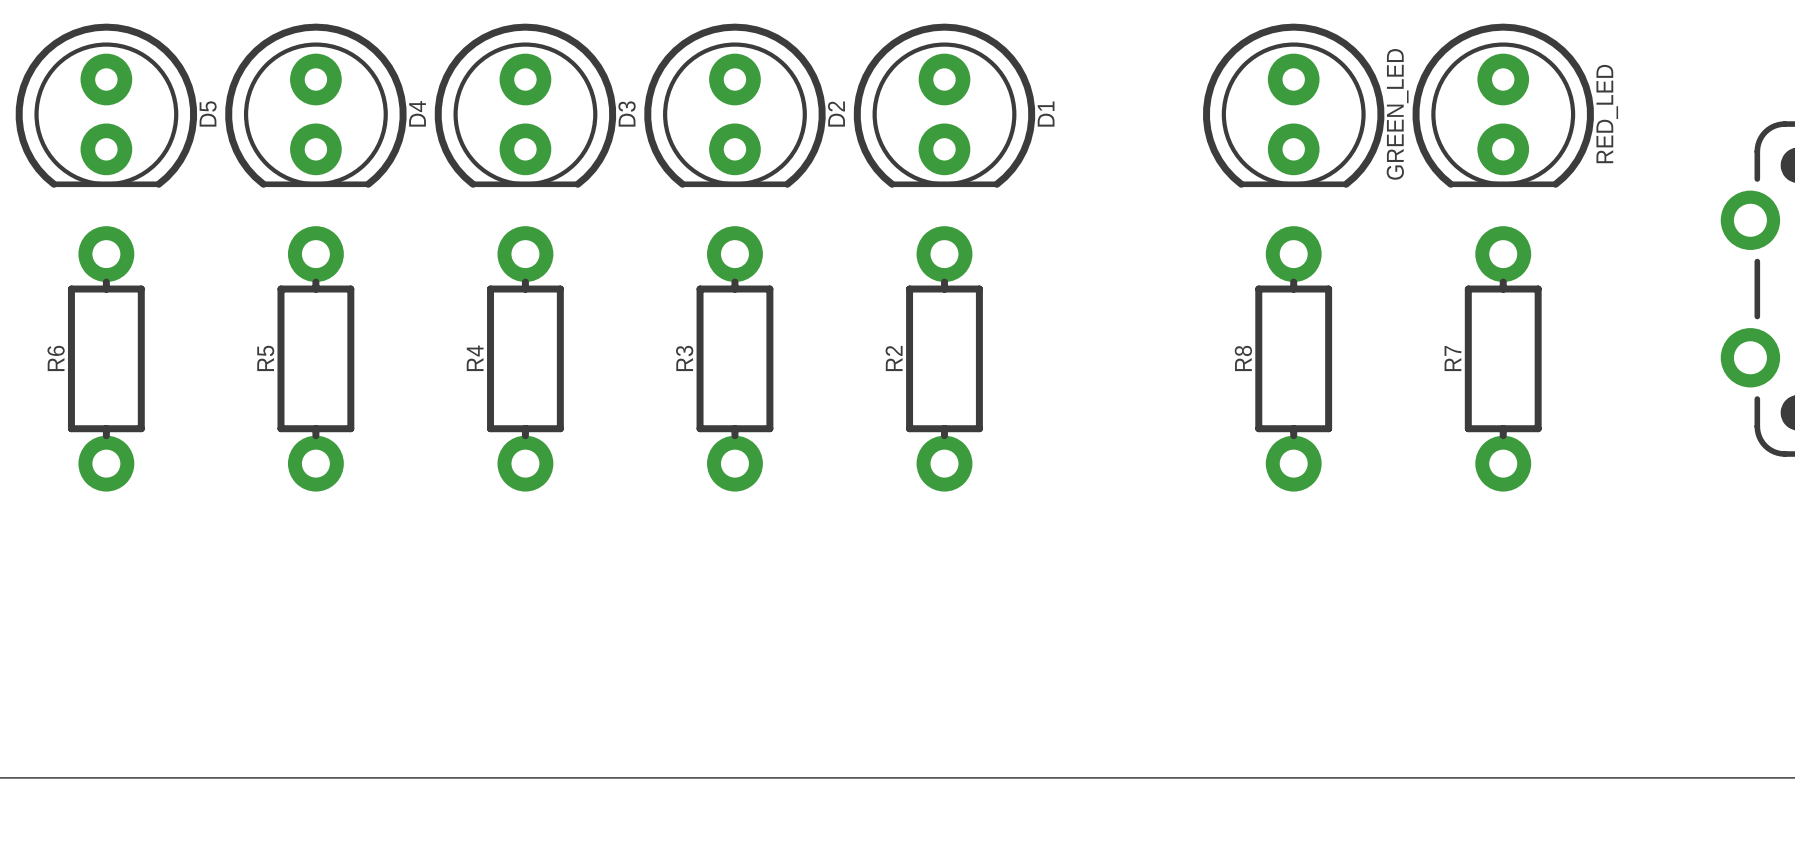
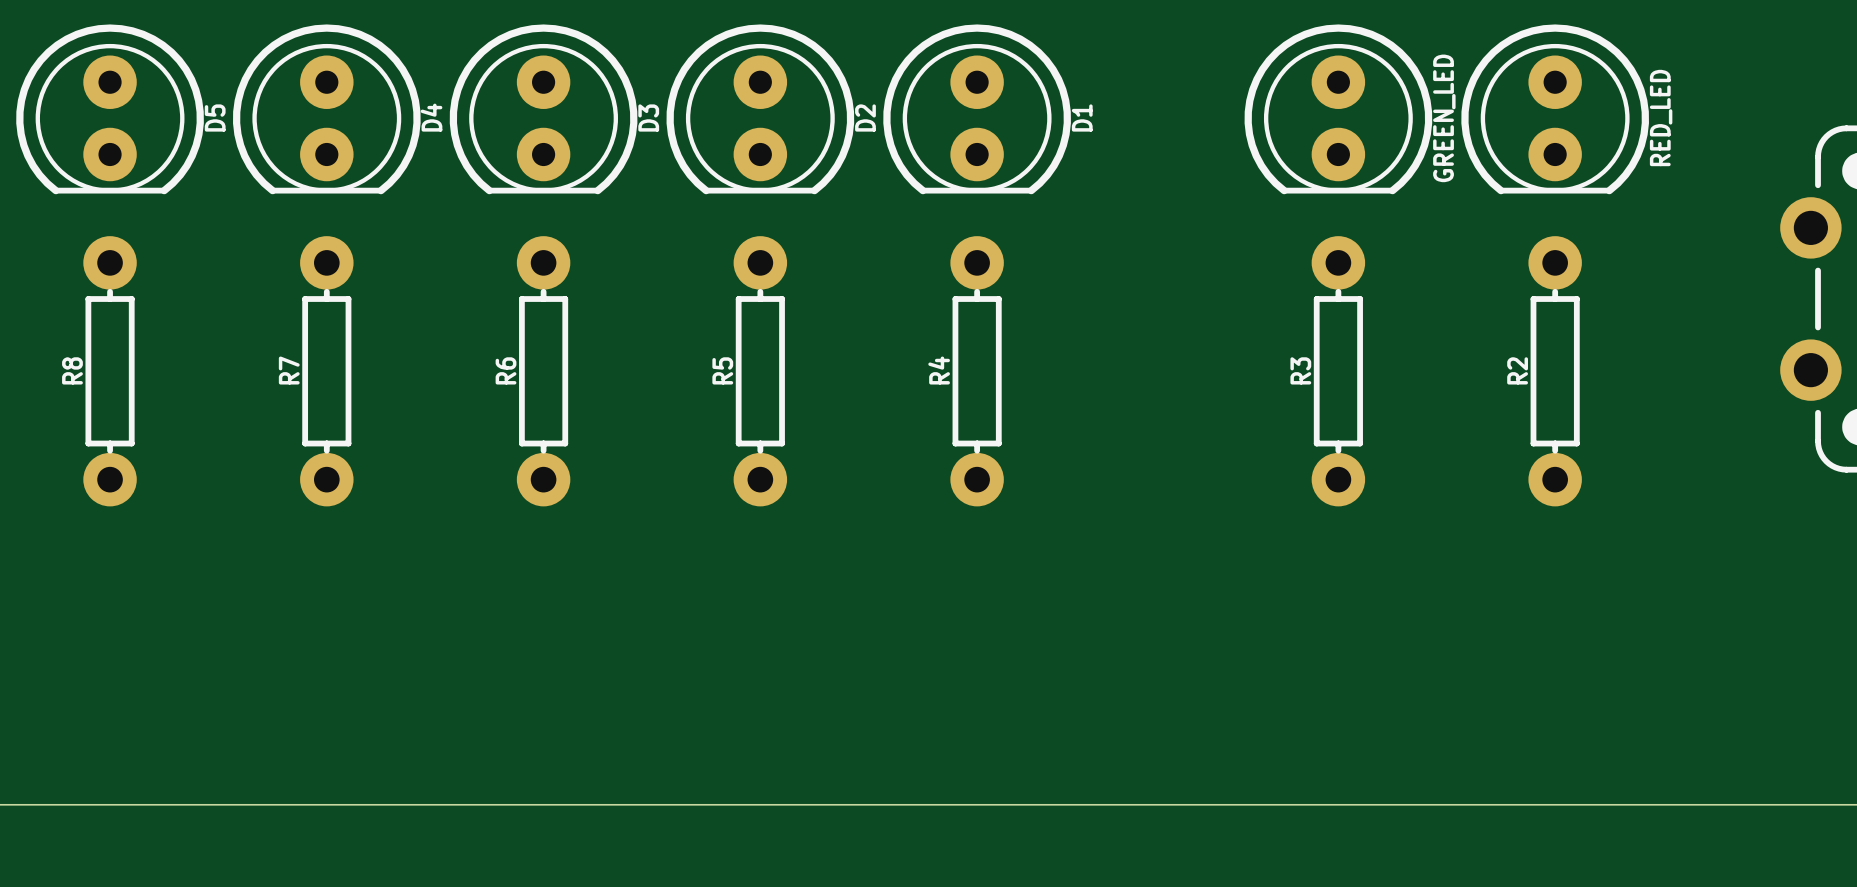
R6 footprint: [67, 226, 145, 492] -> [516, 236, 571, 507]
R5 footprint: [277, 226, 355, 492] -> [733, 236, 788, 507]
R4 footprint: [487, 226, 564, 492] -> [950, 236, 1004, 507]
R3 footprint: [696, 226, 774, 492] -> [1311, 236, 1366, 507]
R2 footprint: [906, 226, 983, 492] -> [1528, 236, 1582, 507]
R8 footprint: [1255, 226, 1333, 492] -> [83, 236, 137, 507]
R7 footprint: [1464, 226, 1542, 492] -> [300, 236, 354, 507]

